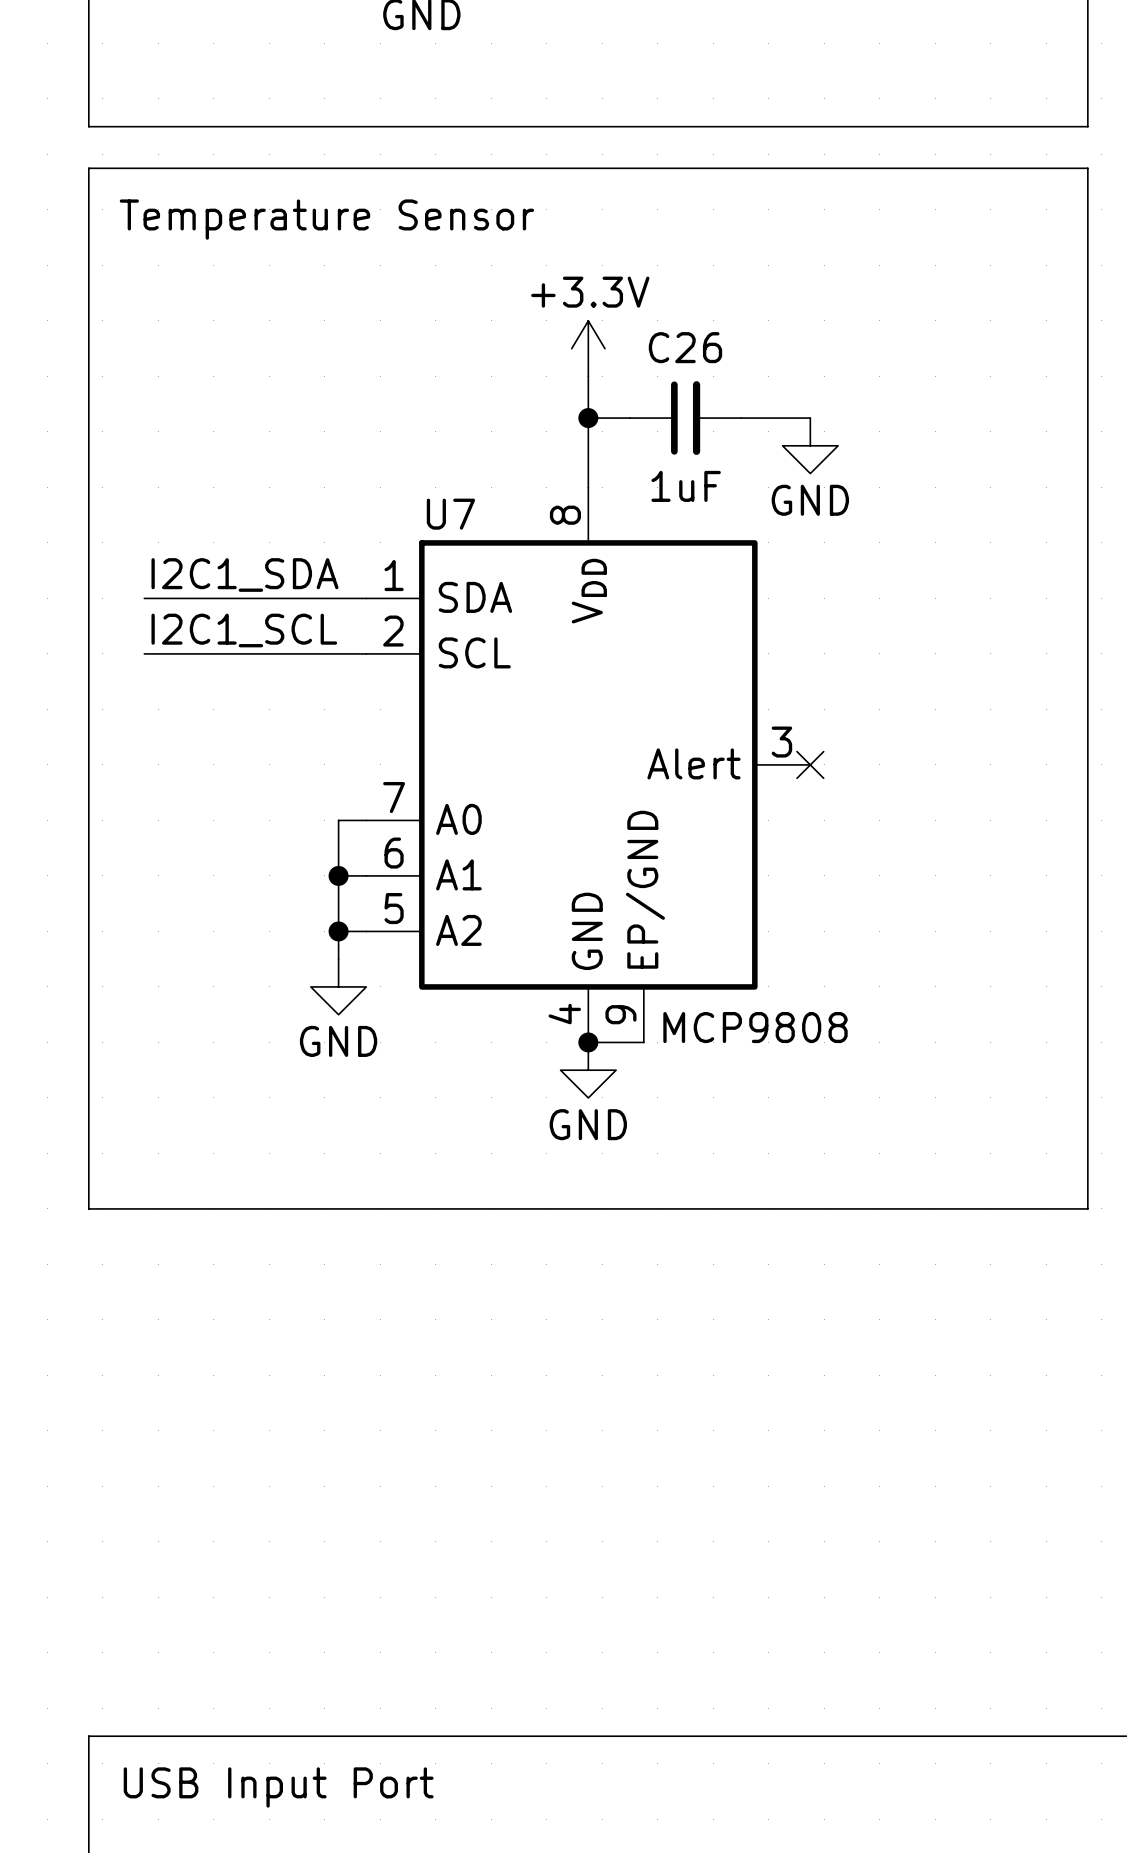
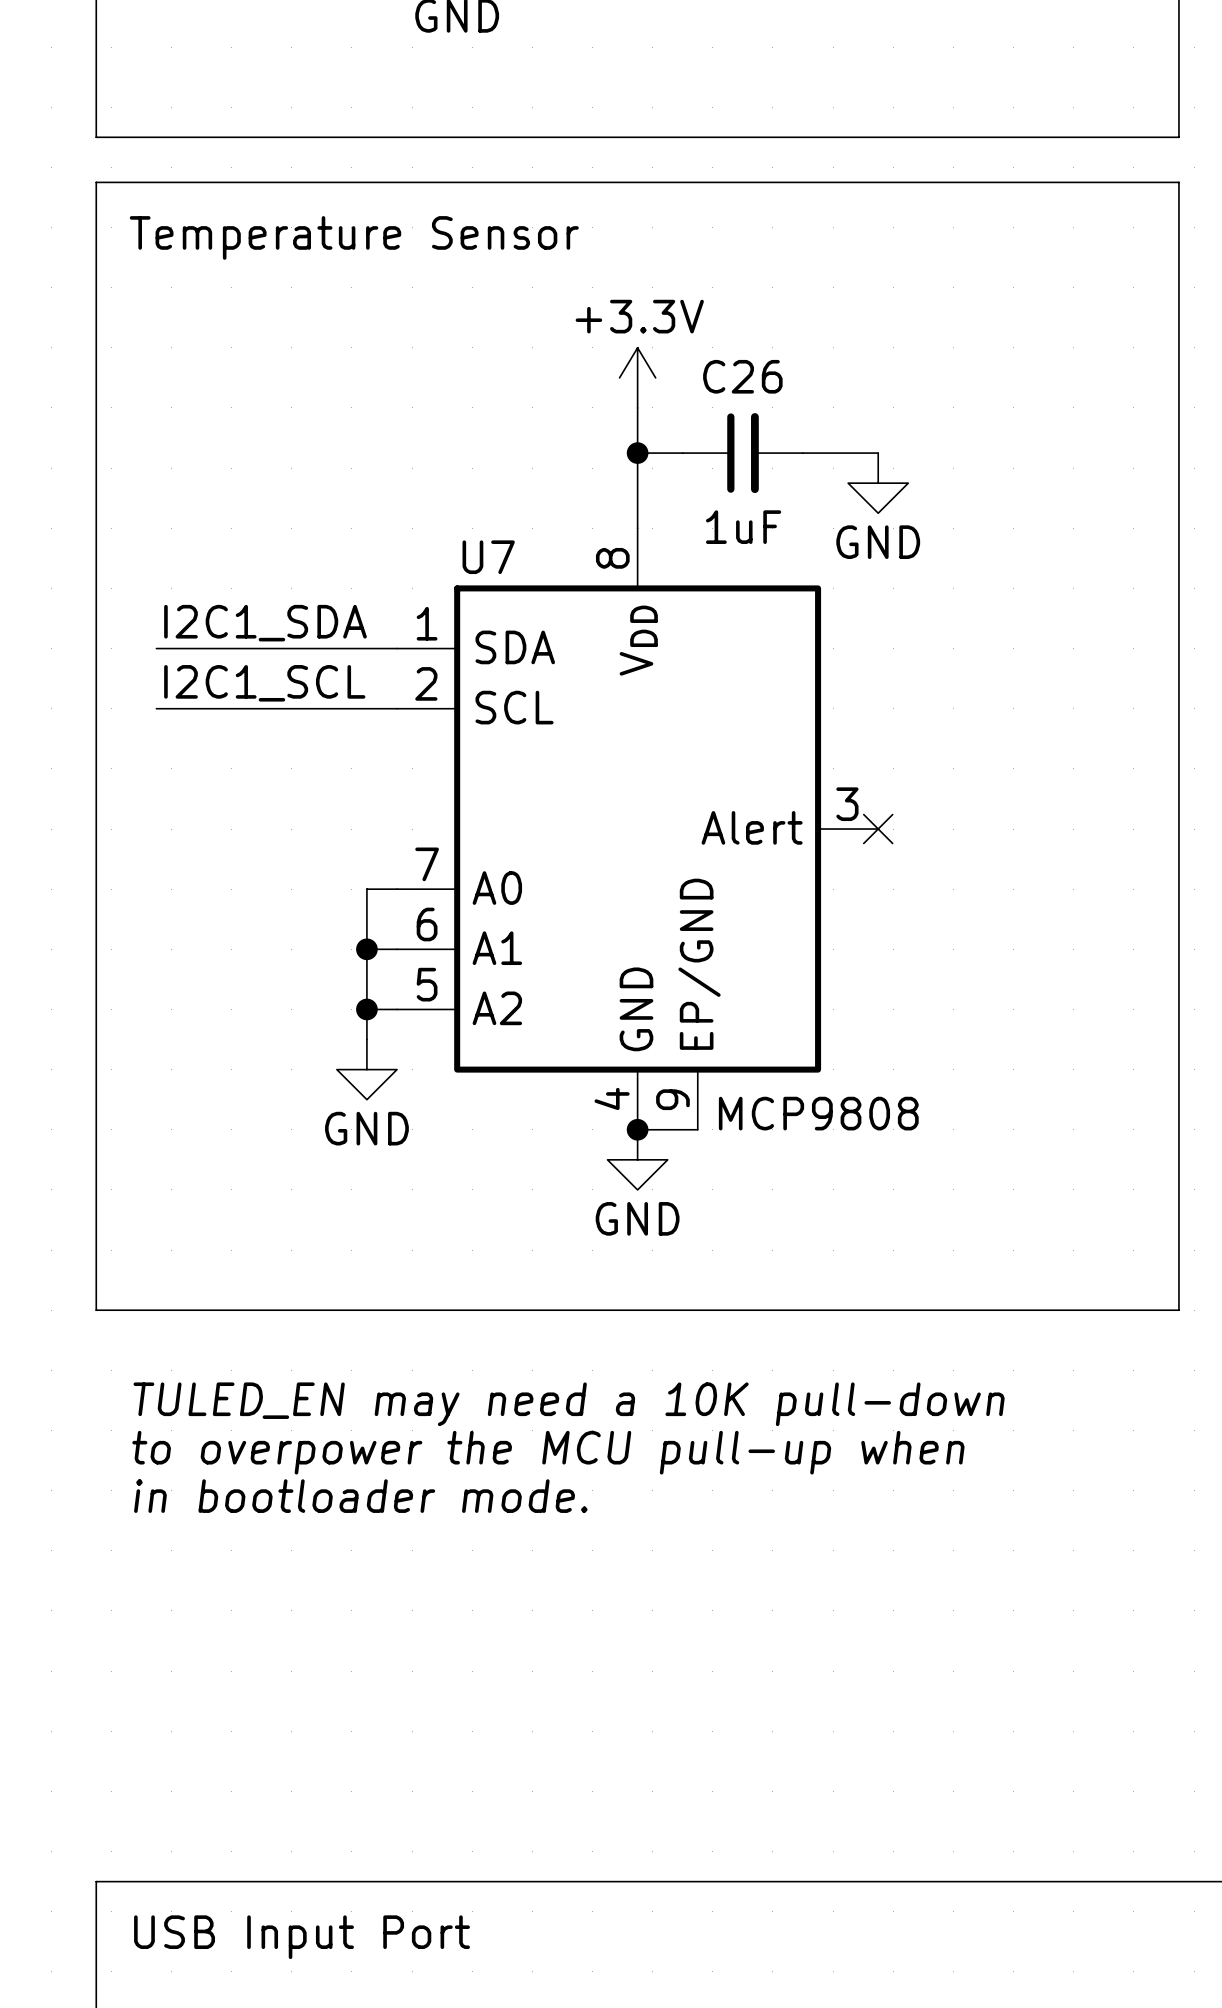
text: none -> TULED_EN may need a 10K pull-down (569, 1404)
text: none -> to overpower the MCU pull-up when (548, 1452)
text: none -> in bootloader mode. (360, 1496)

